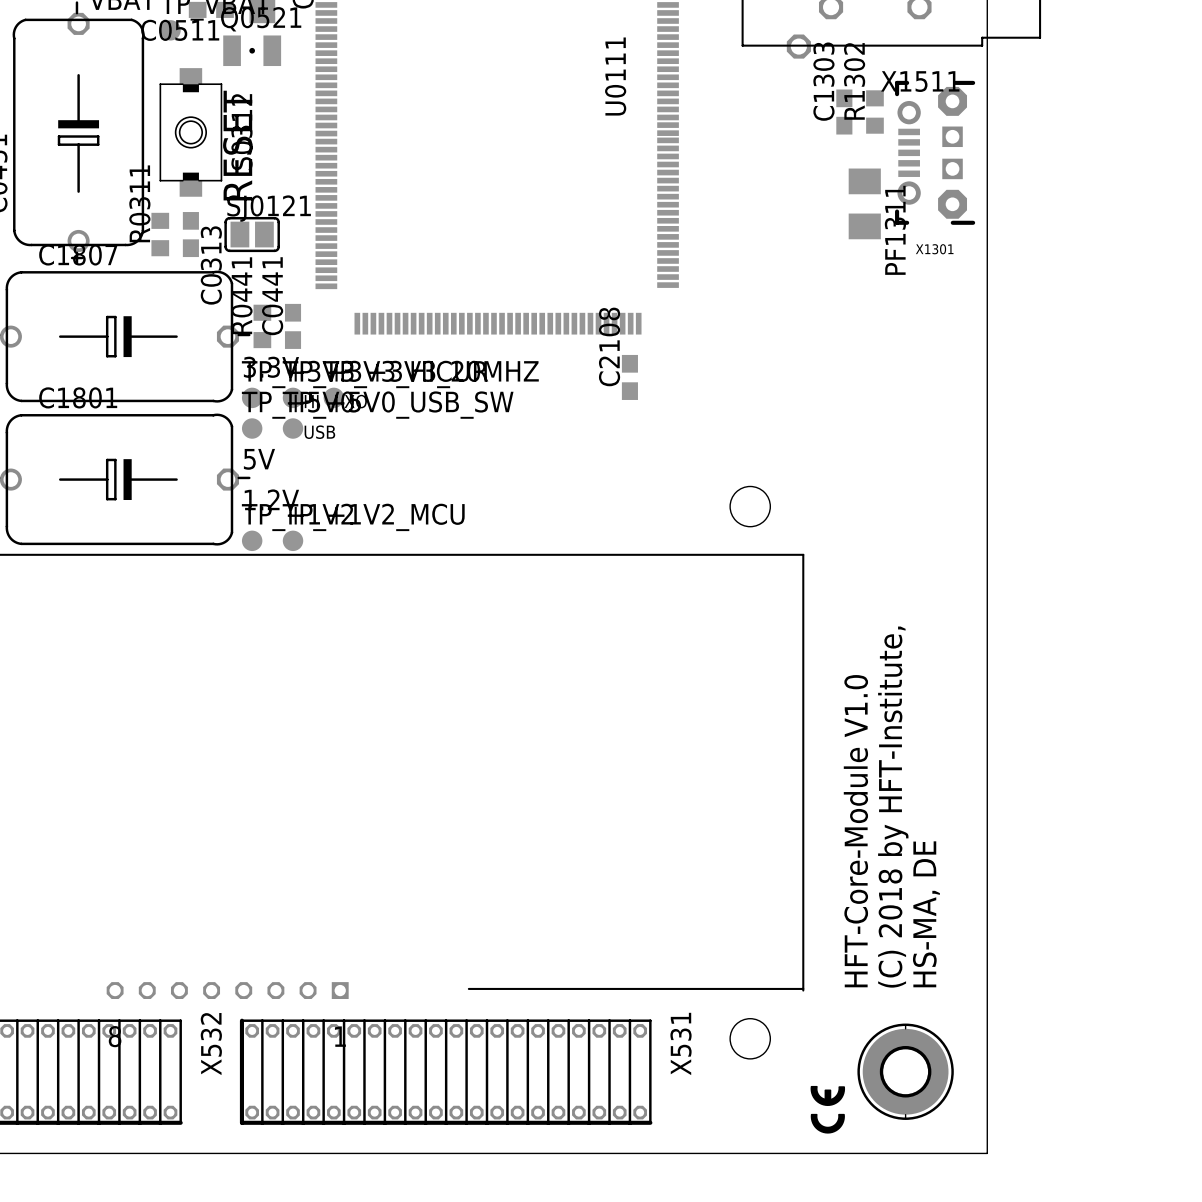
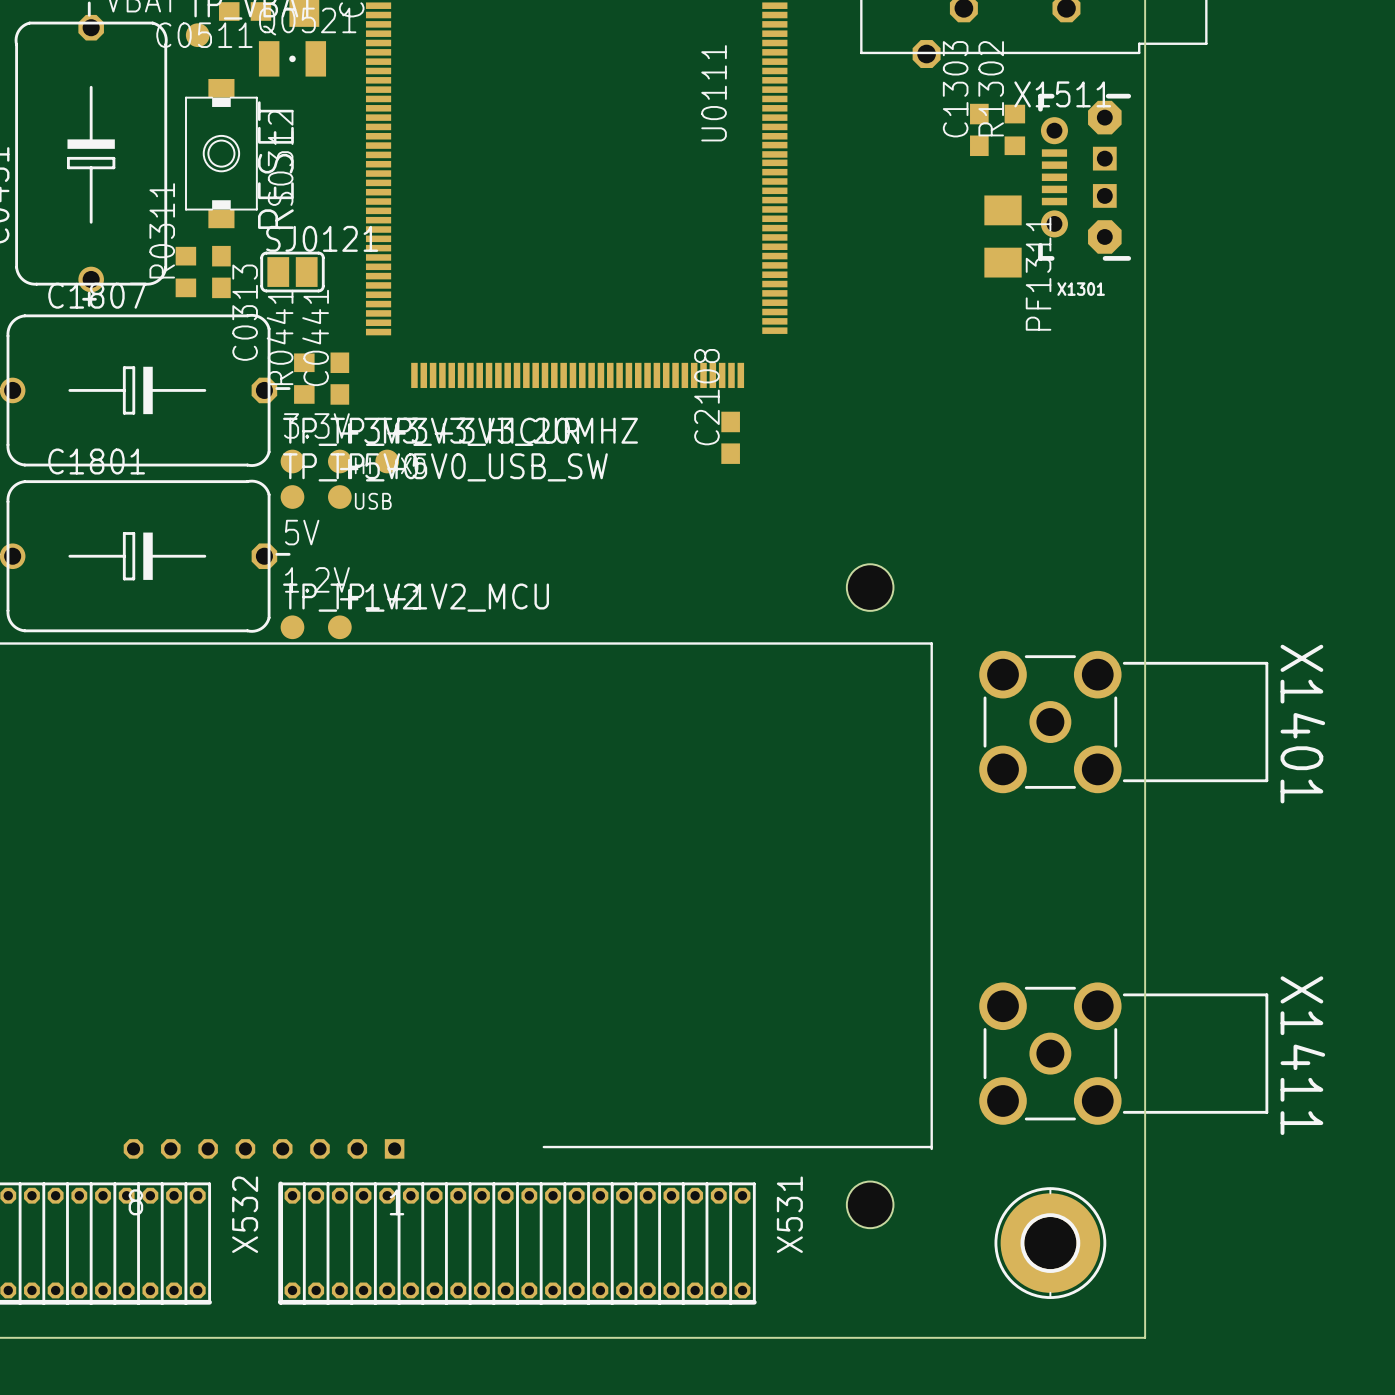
X1401: none -> (1123, 722)
text: (C) 2018 by HFT-Institute, (893, 807) -> none
text: HFT-Core-Module V1.0 (855, 831) -> none
X1411: none -> (1123, 1053)
text: HS-MA, DE (926, 914) -> none
drawing: [810, 1085, 846, 1134] -> none

